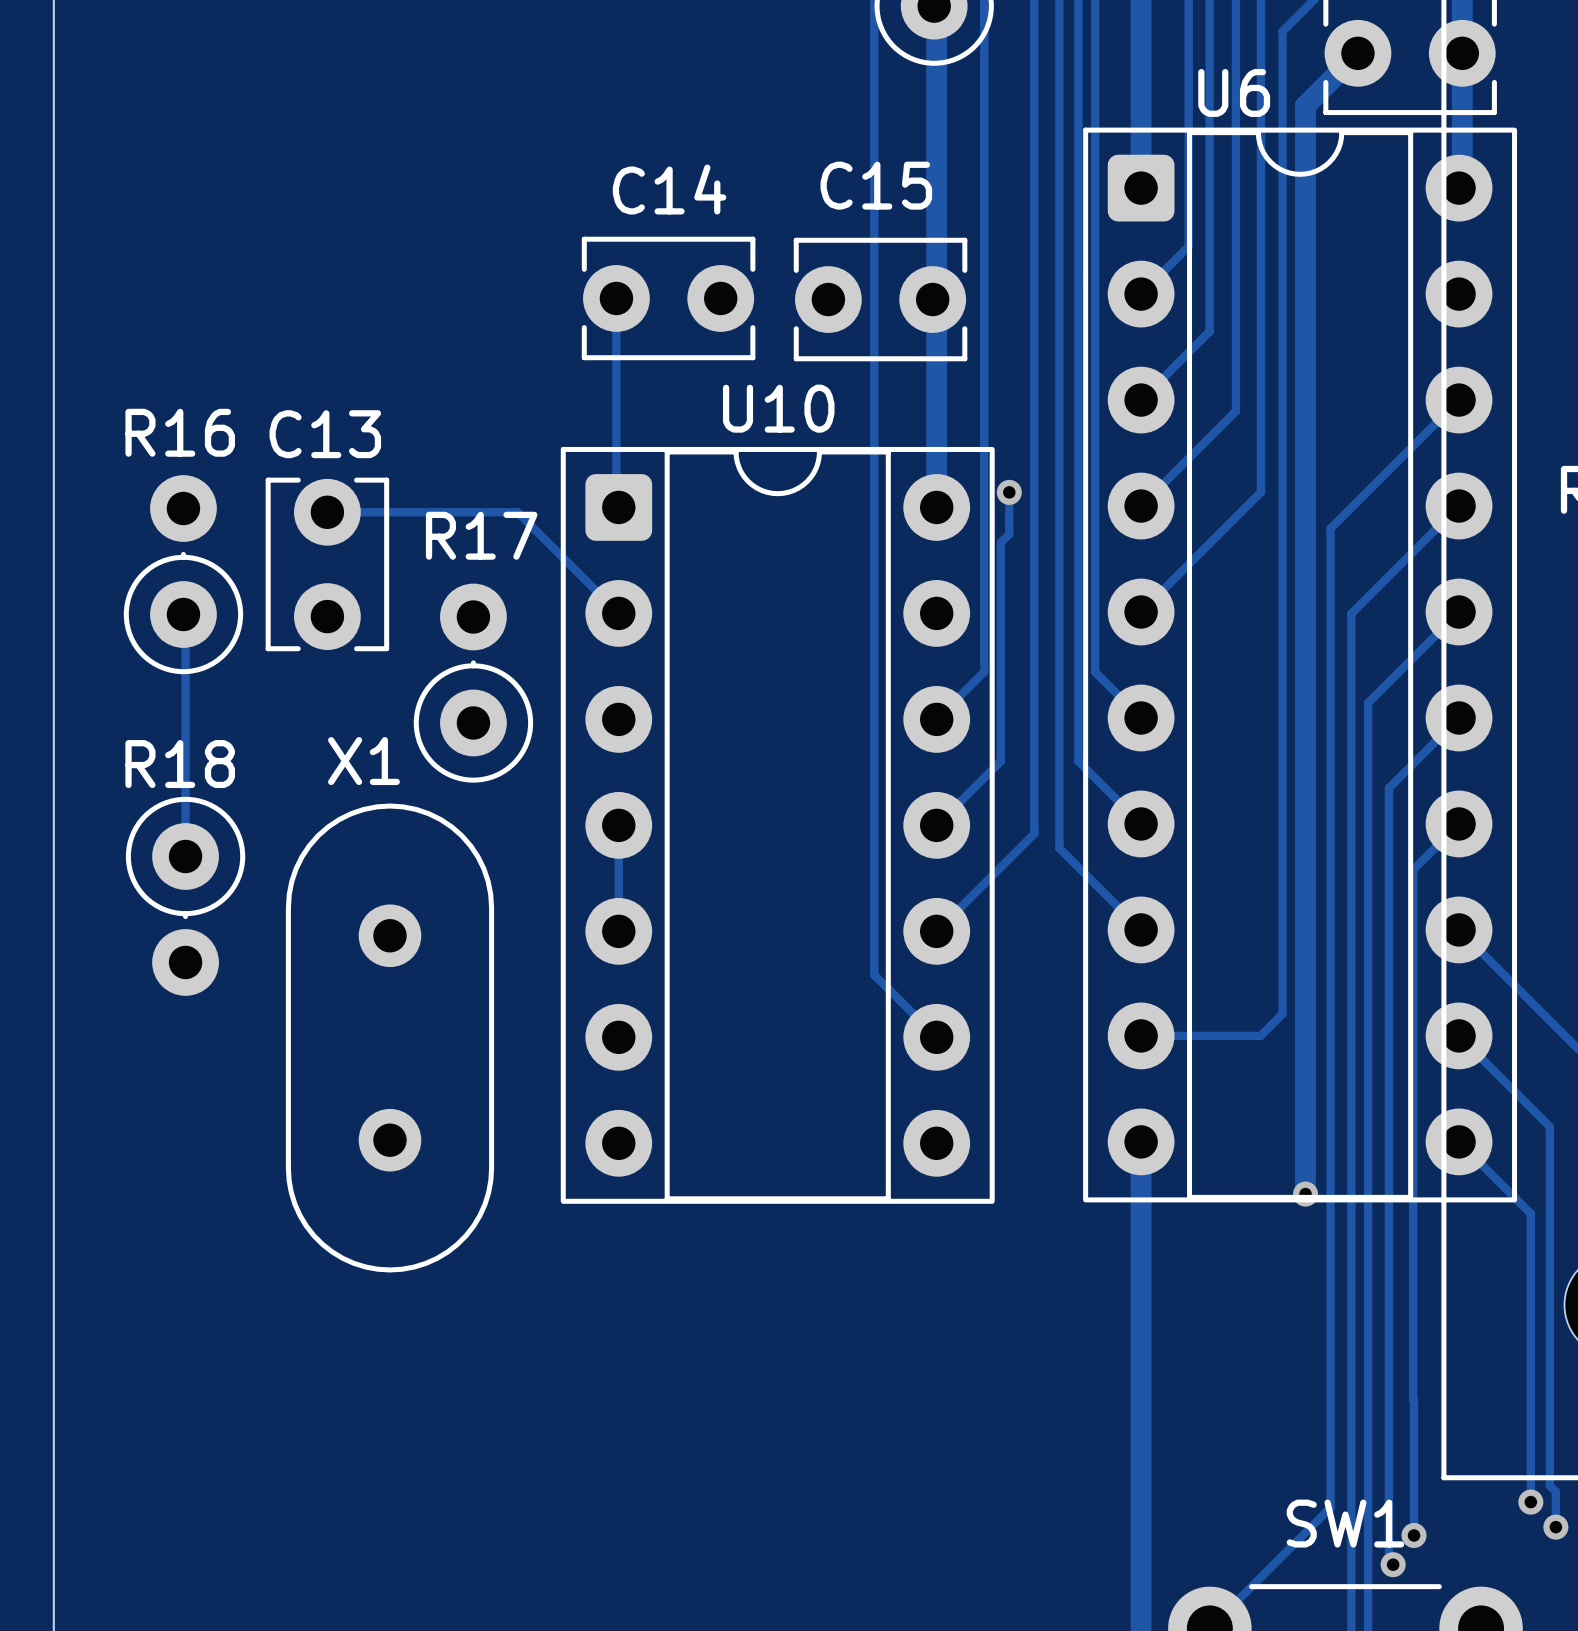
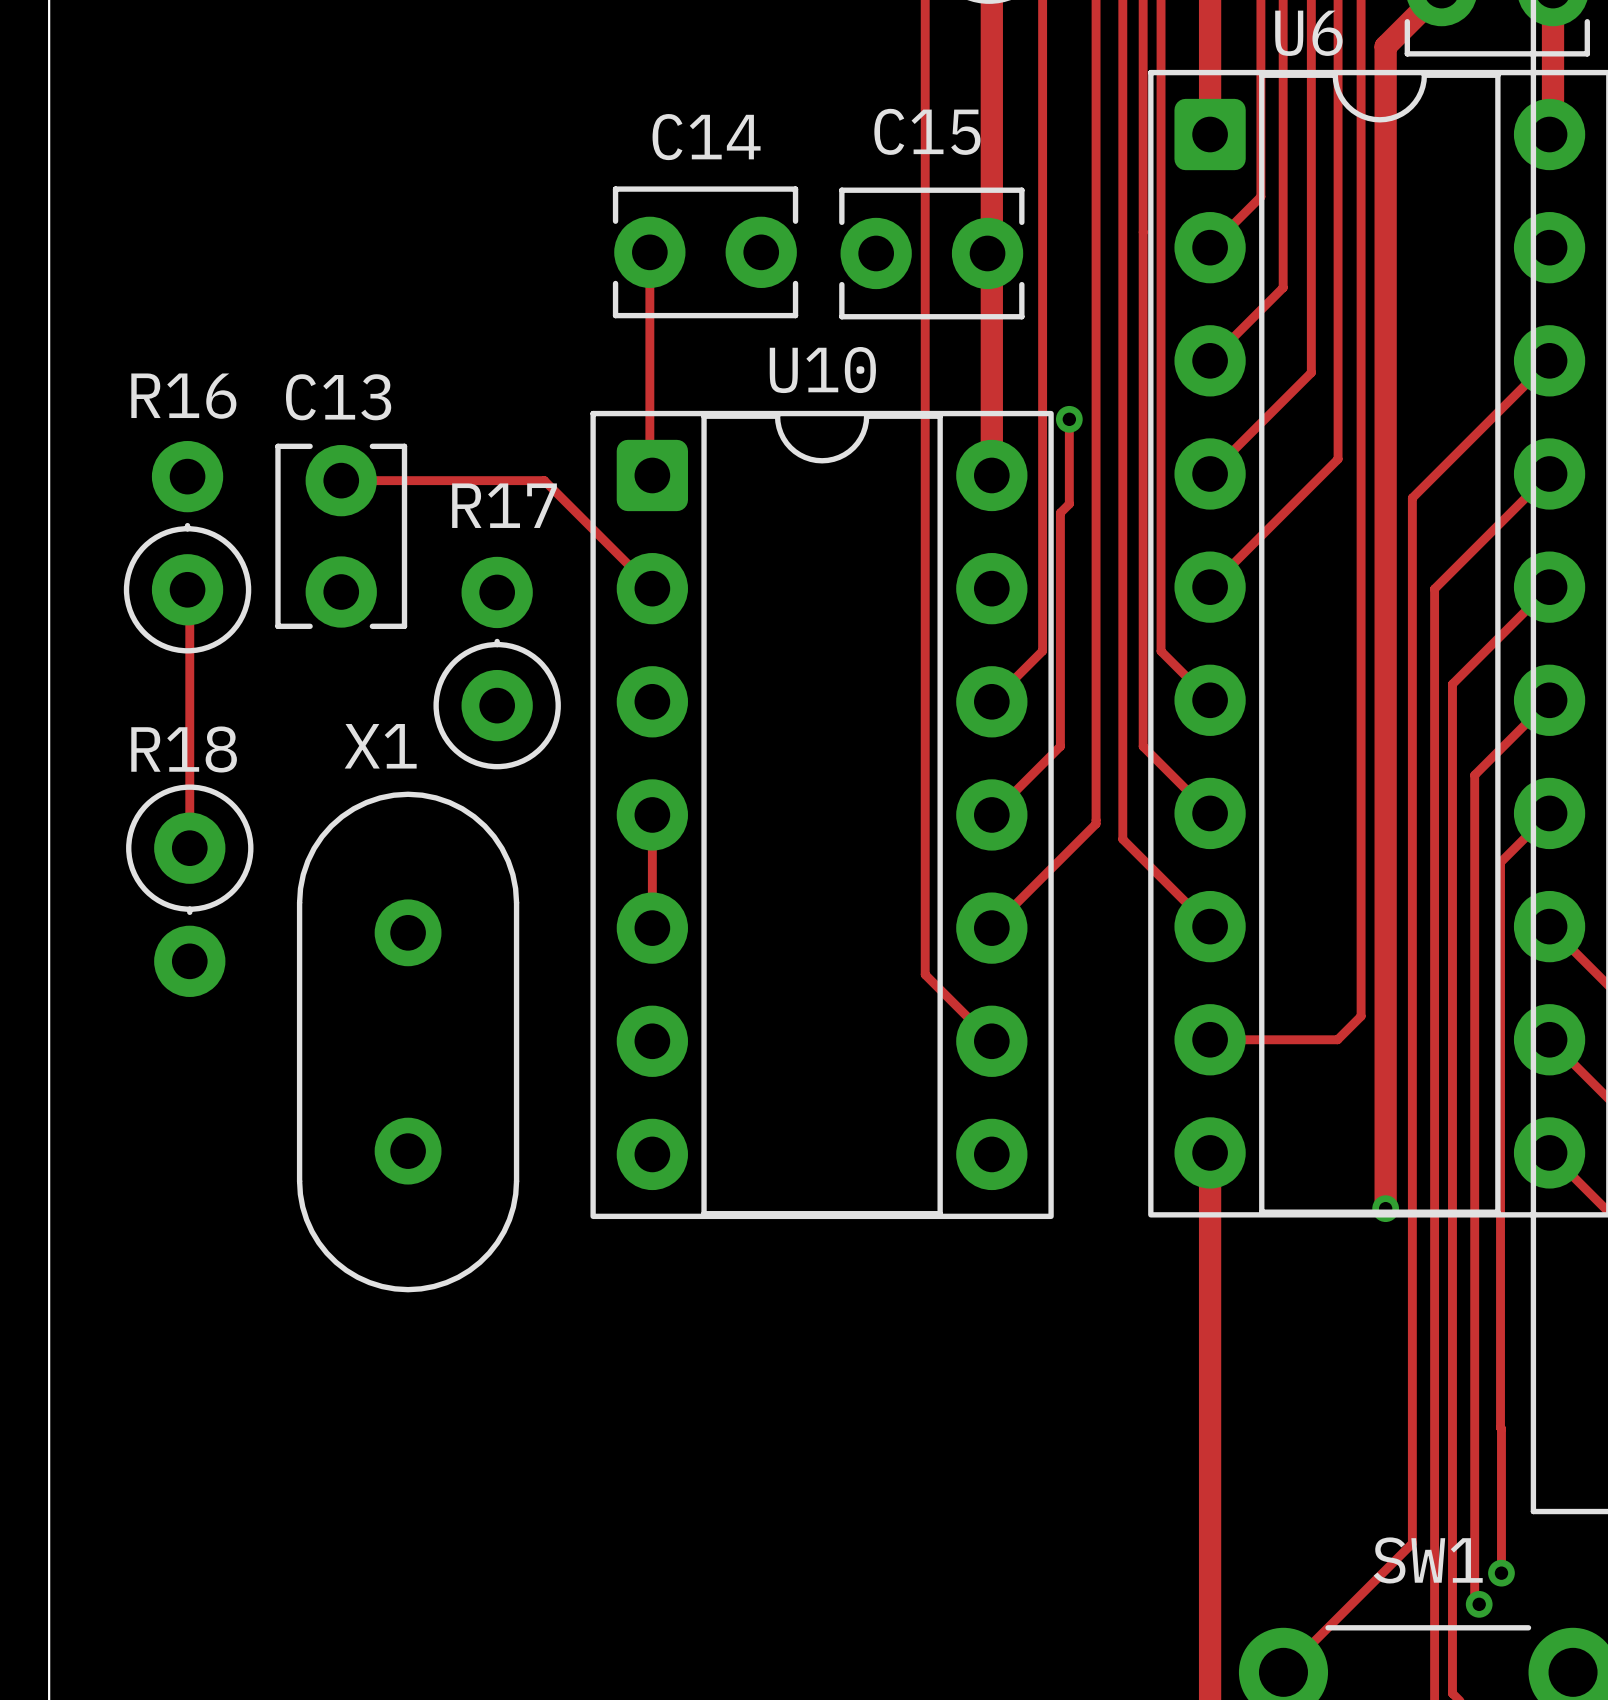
track: none -> (1069, 419) (1069, 459)
via position: (1009, 492) -> (1069, 419)

